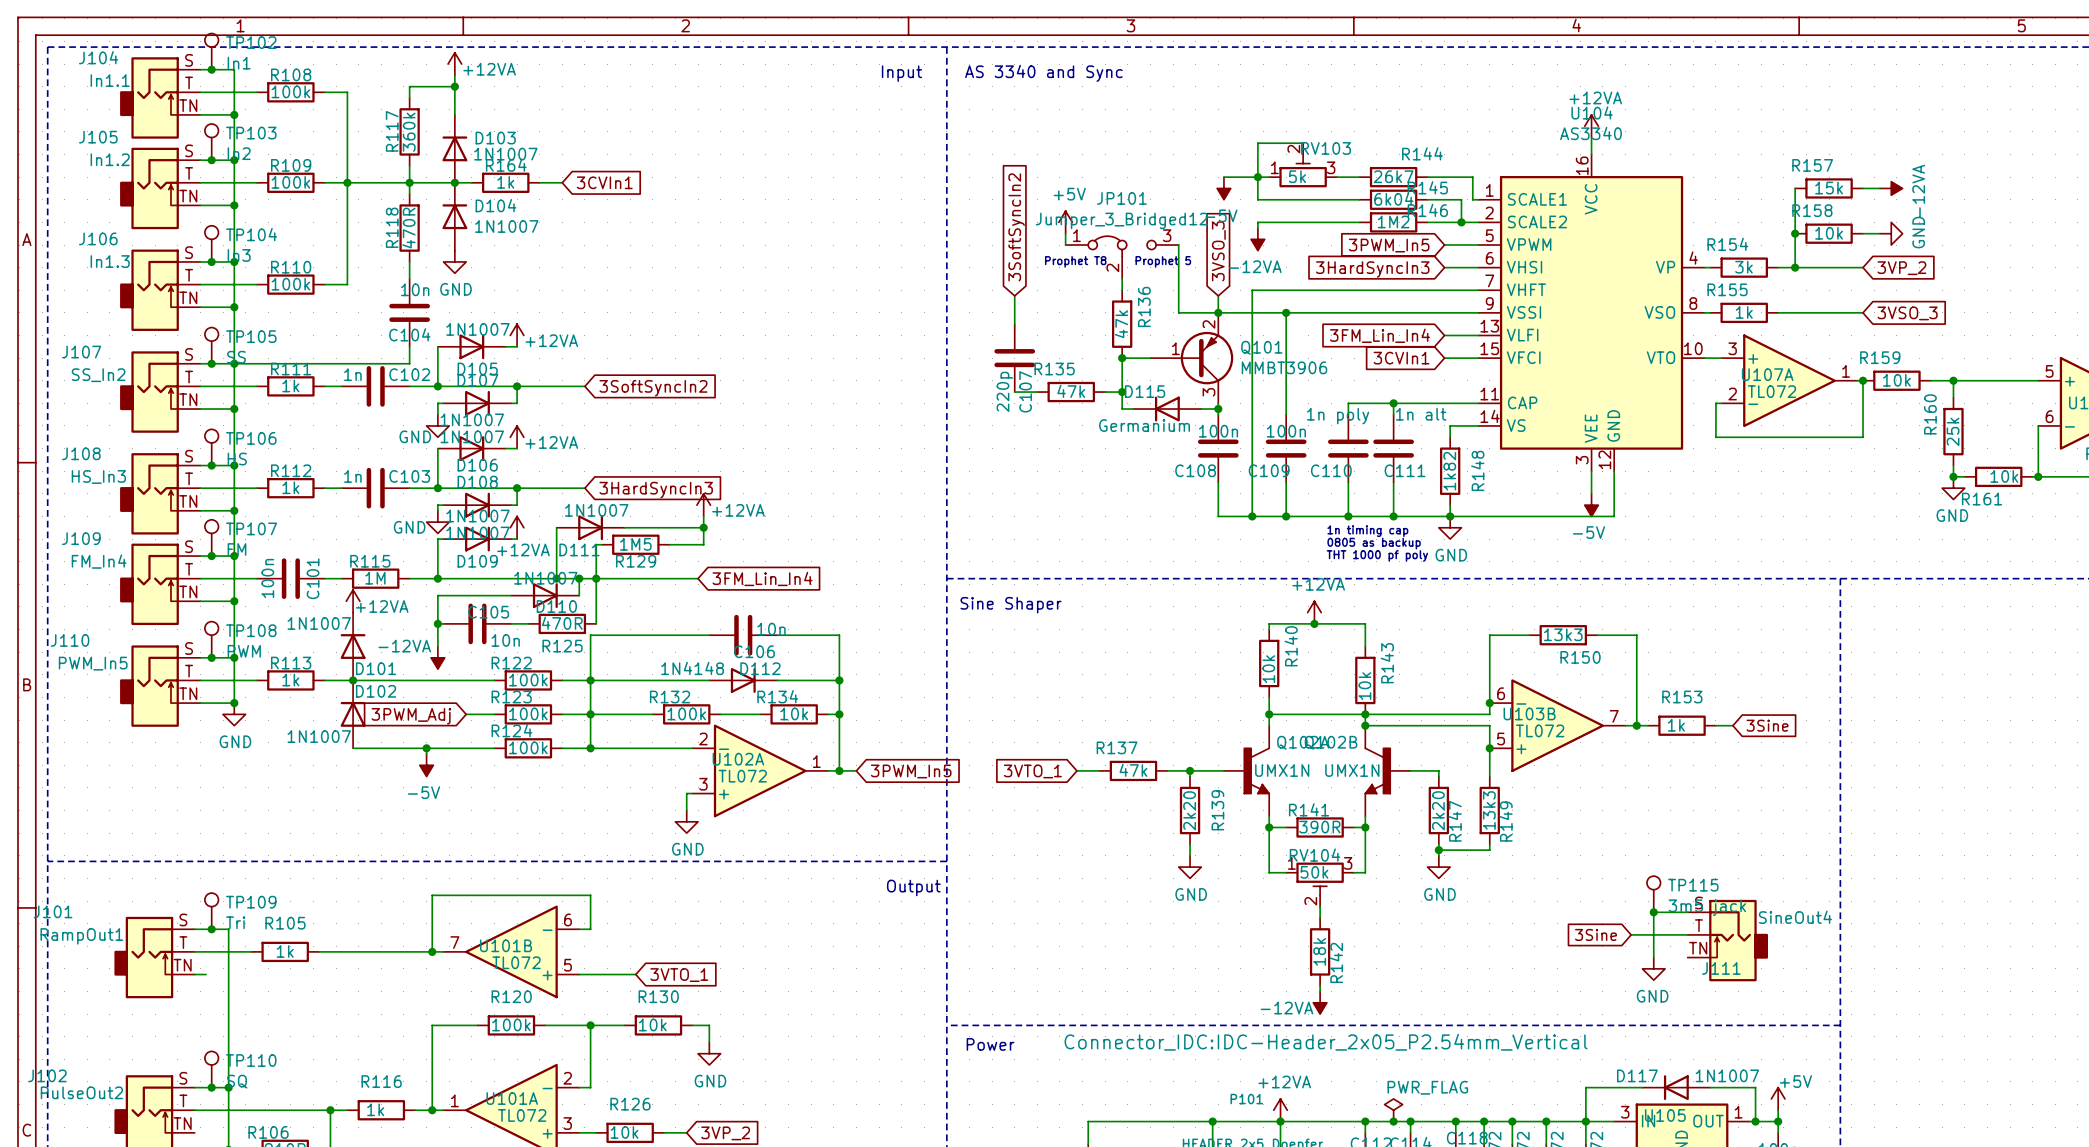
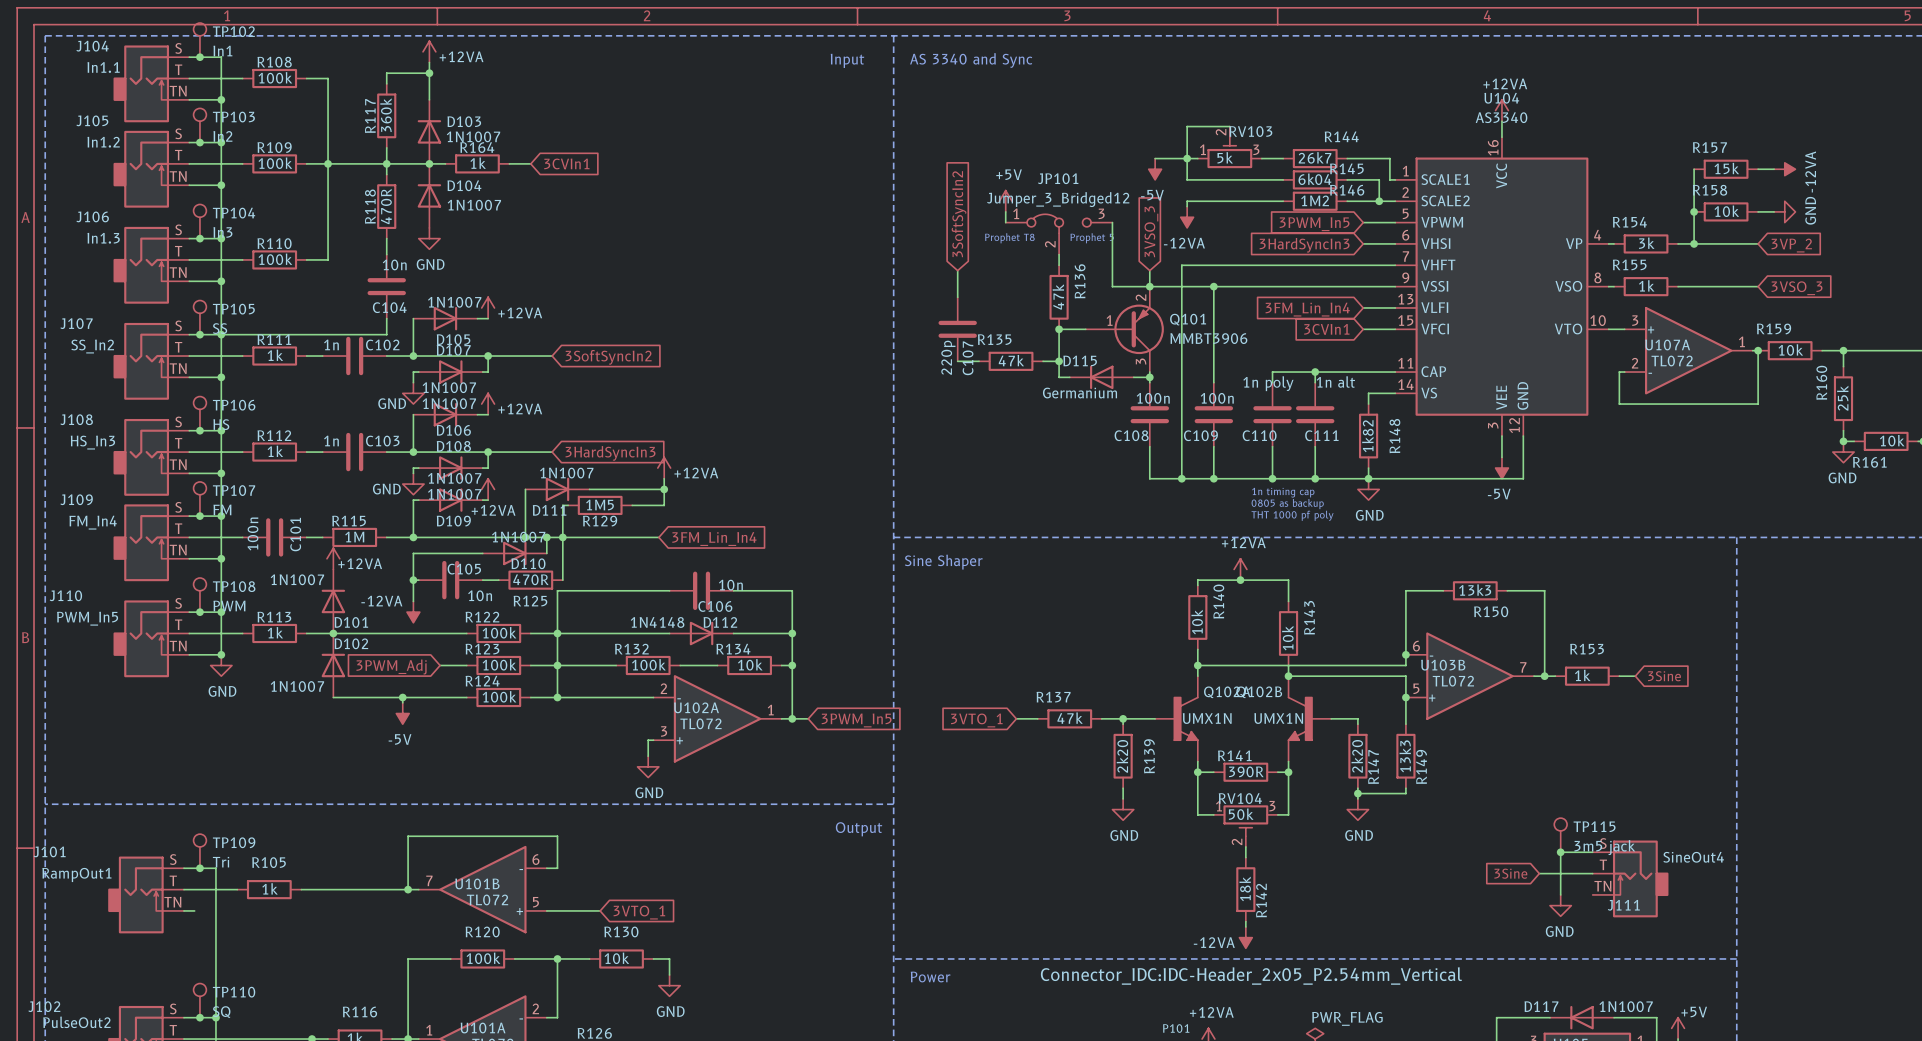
junction: (1365, 714) -> none

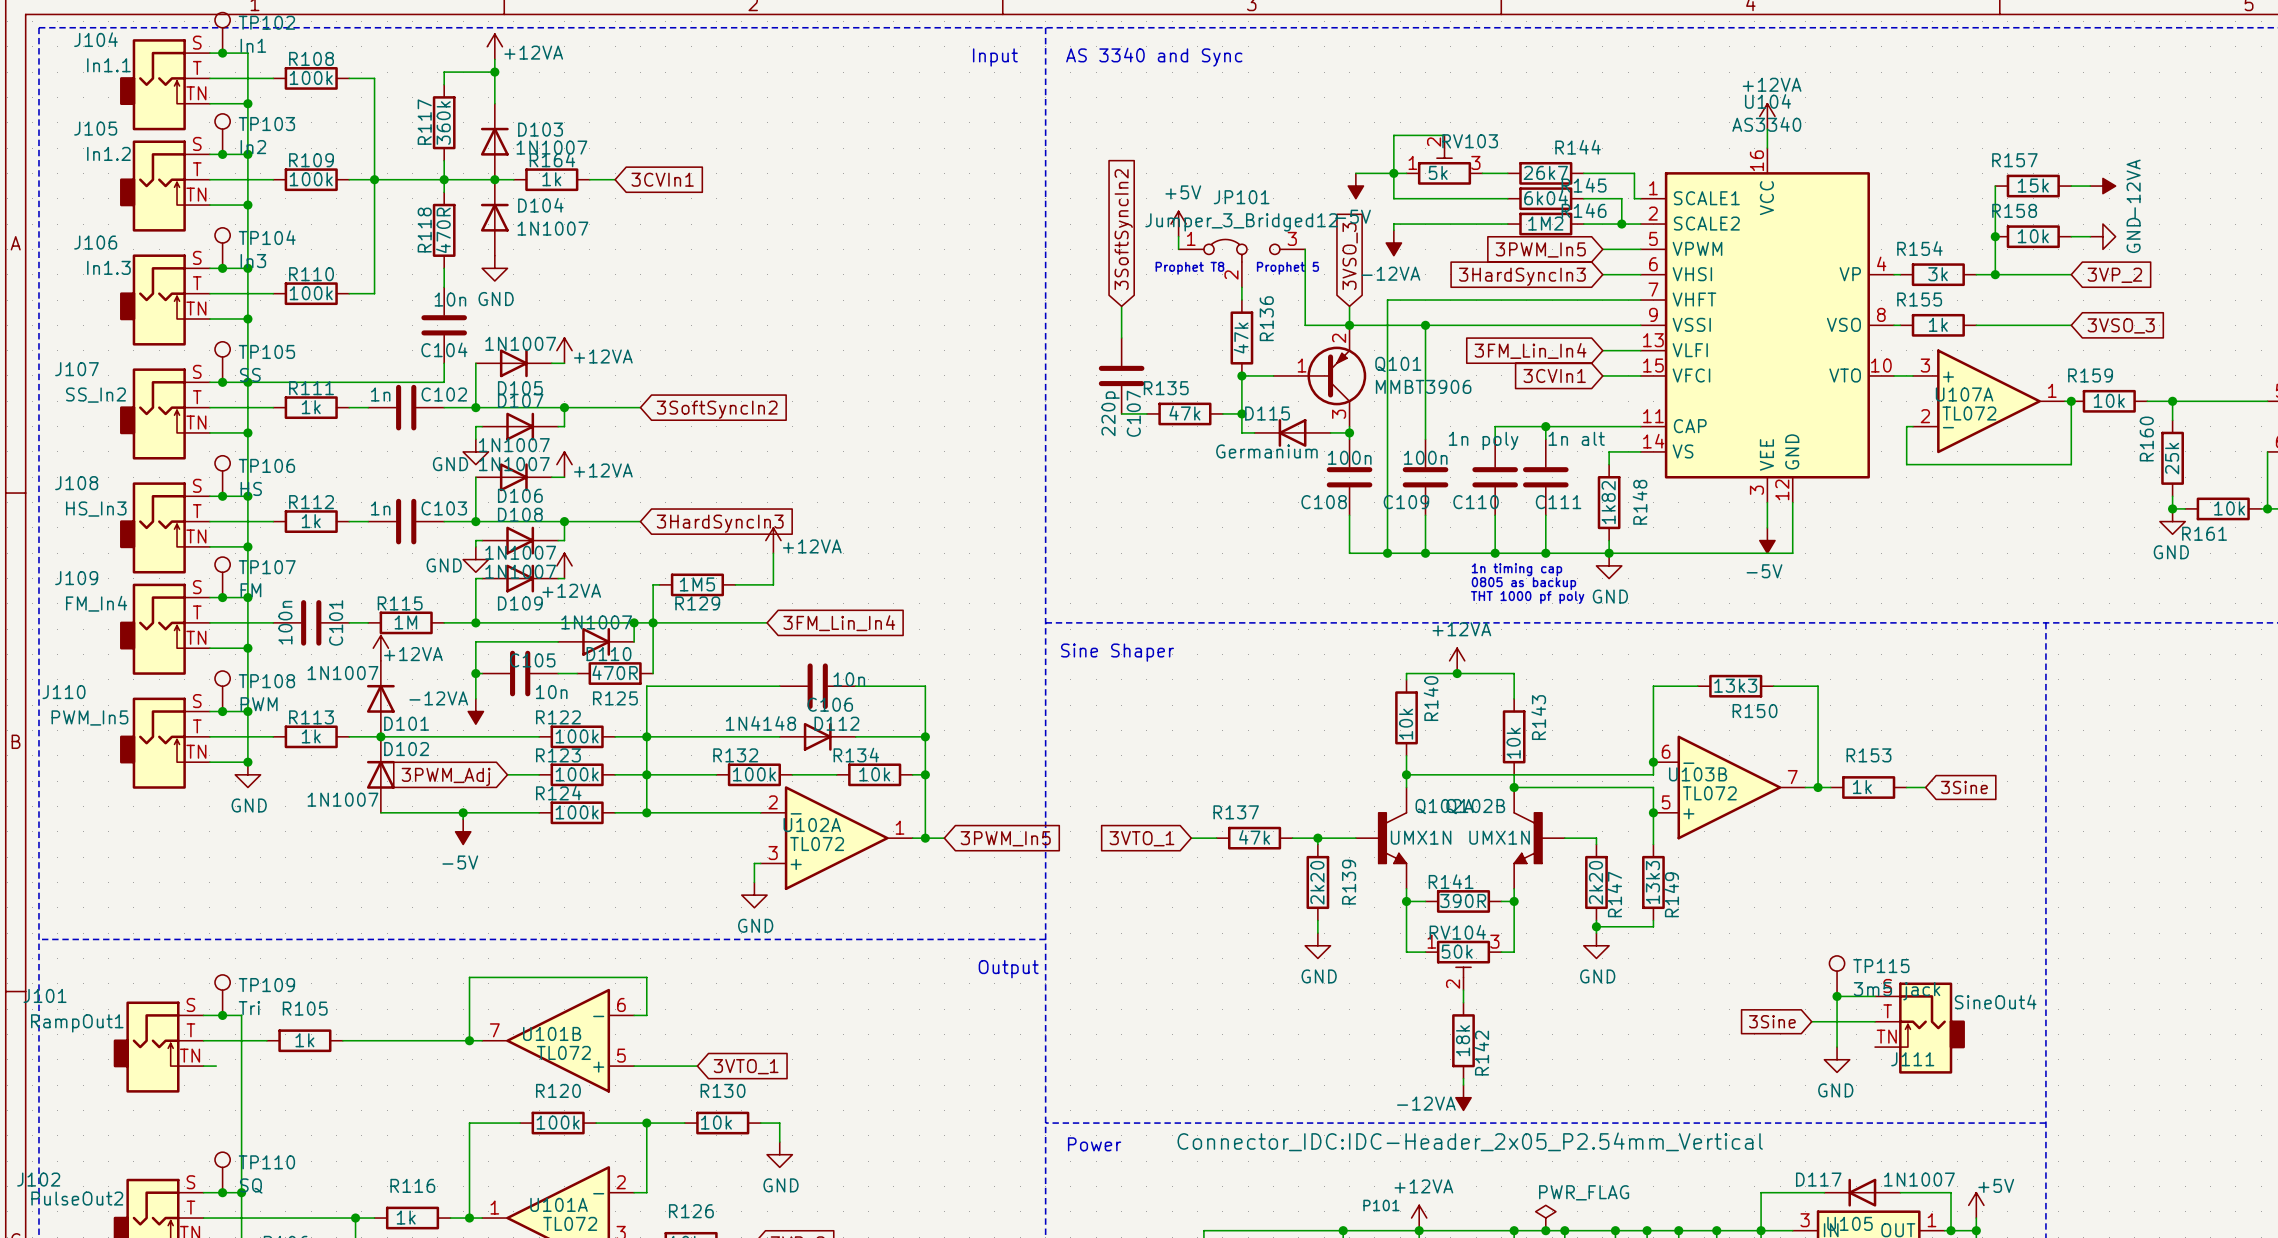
wire: (525, 489) (525, 537) -> none
D111: 1N1007 (557, 489) -> none
wire: (589, 489) (664, 489) -> none
junction: (664, 489) -> none
junction: (525, 537) -> none

